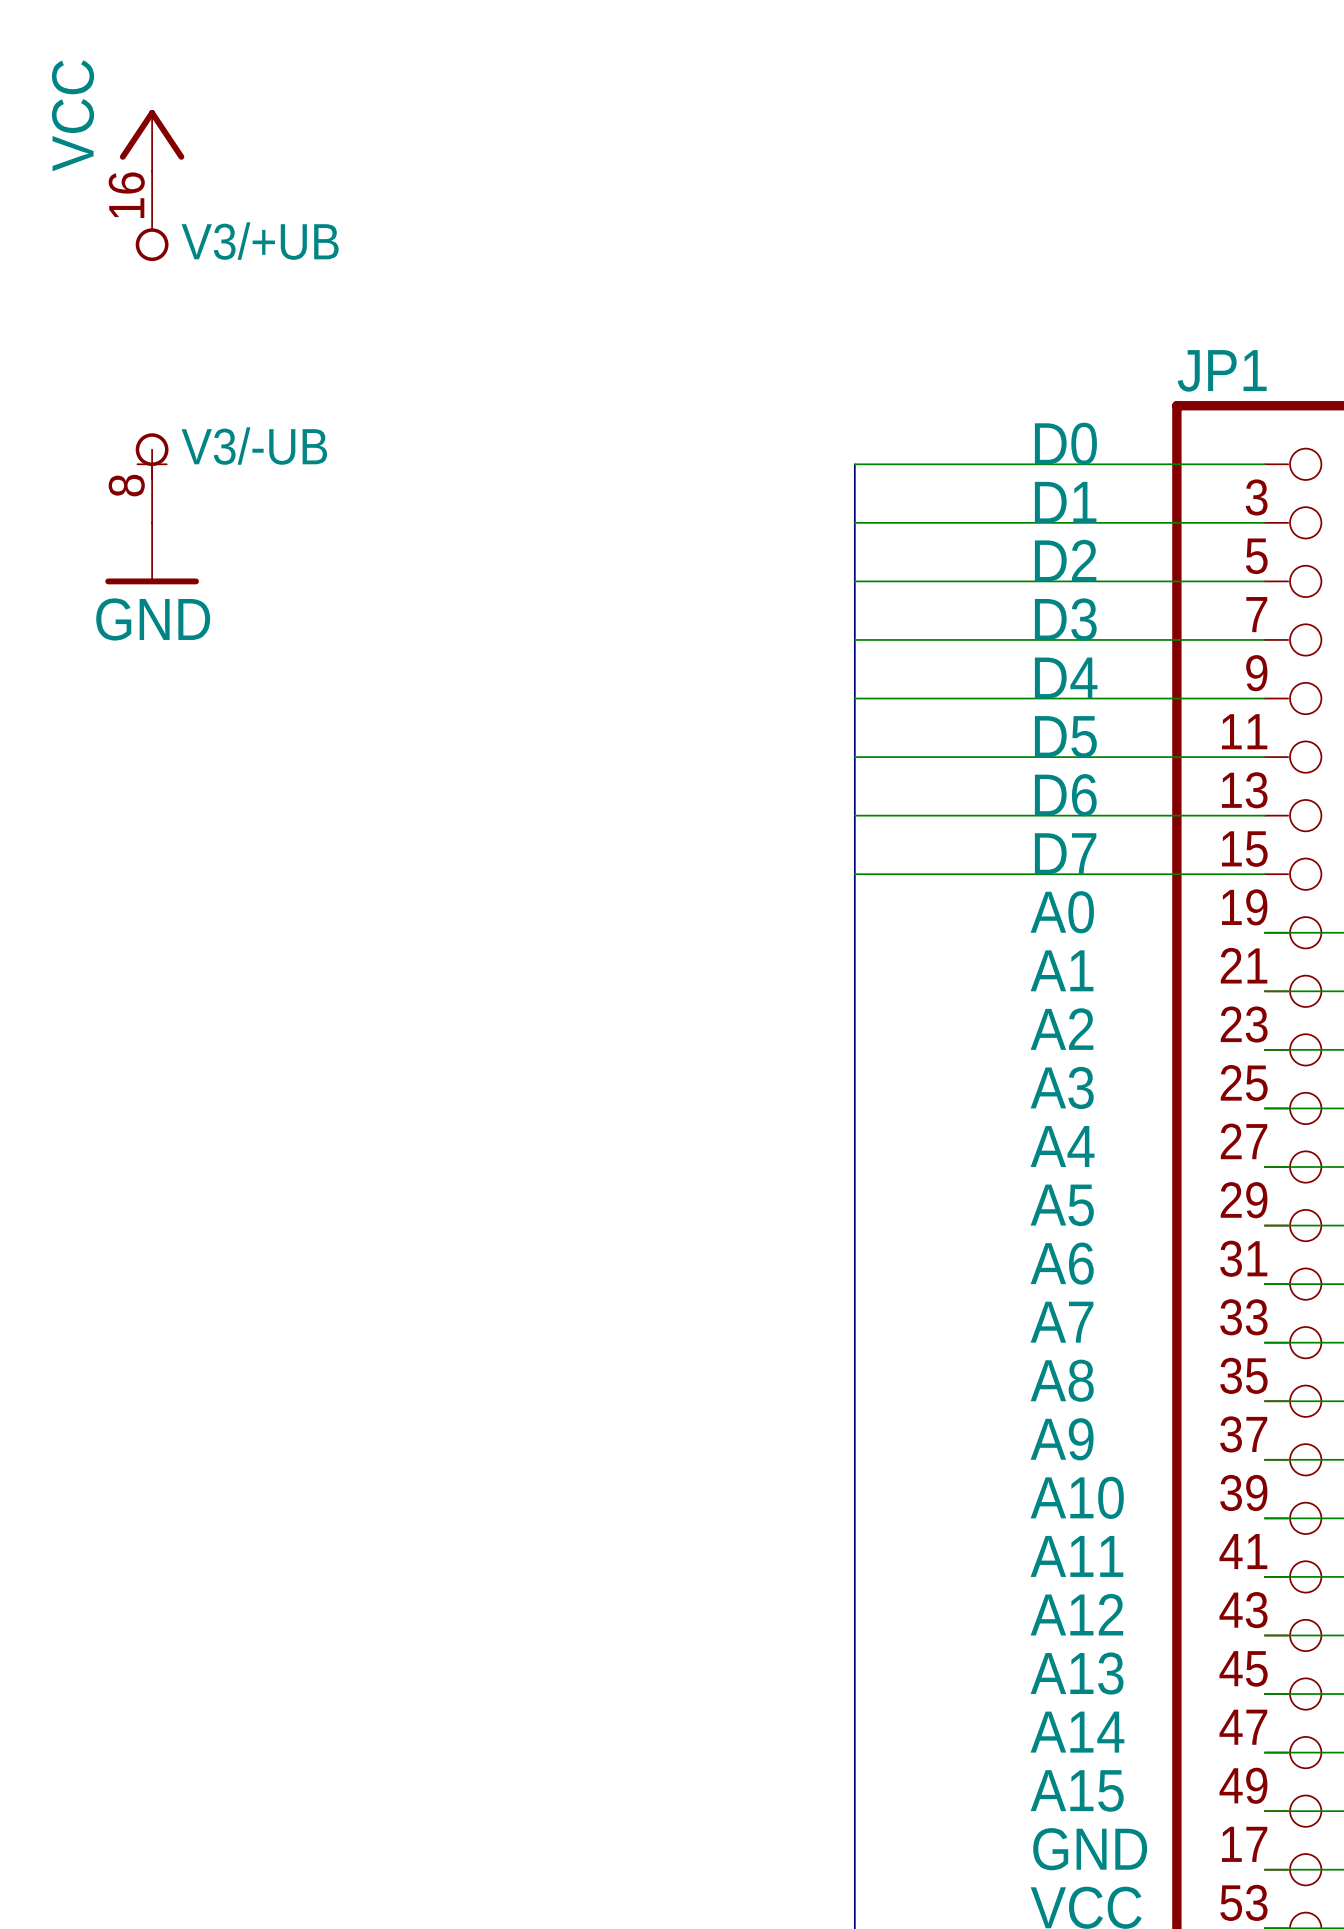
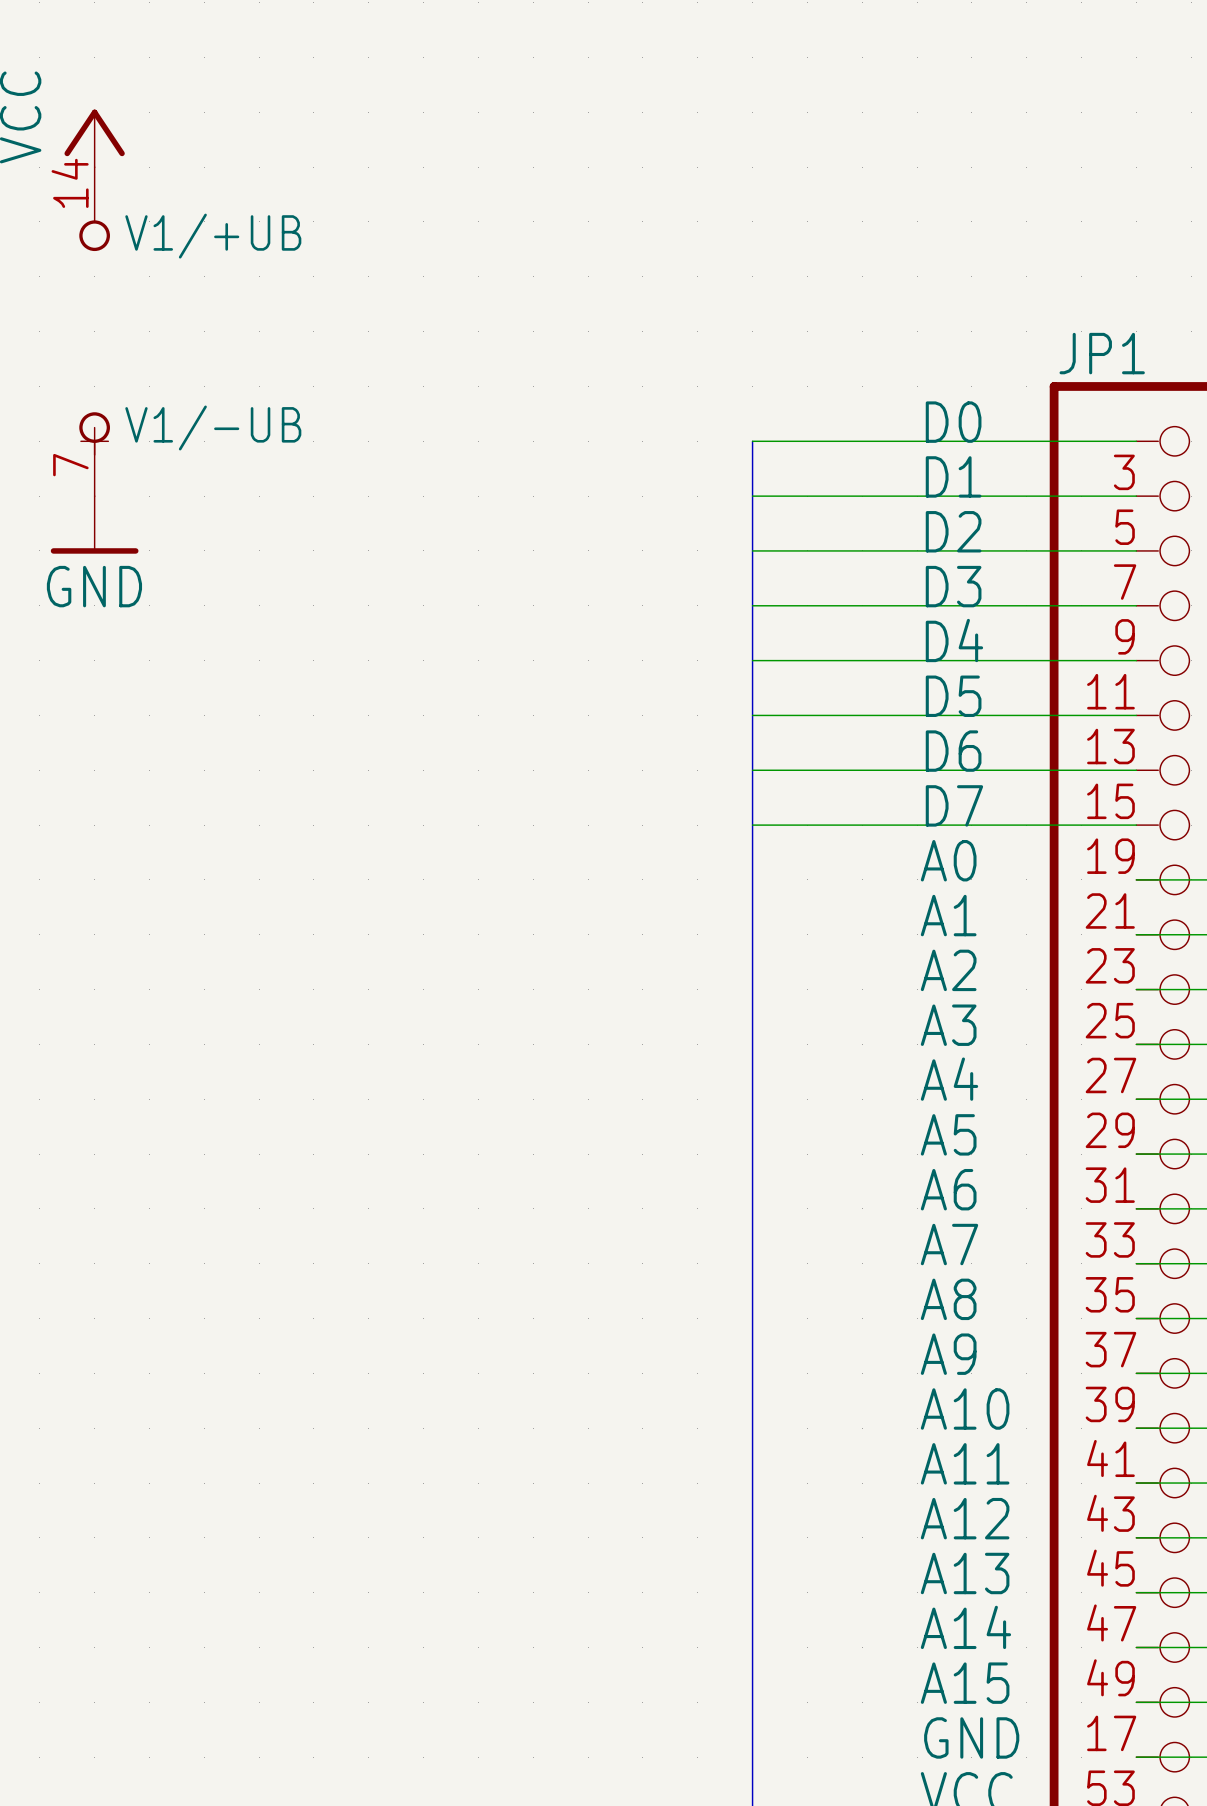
V3/+UB pin number: 16 (126, 195) -> 14 (70, 183)
V3/+UB name: V3/+UB (260, 241) -> V1/+UB (213, 236)
V3/-UB name: V3/-UB (254, 446) -> V1/-UB (213, 427)
V3/-UB pin number: 8 (126, 485) -> 7 (70, 465)

